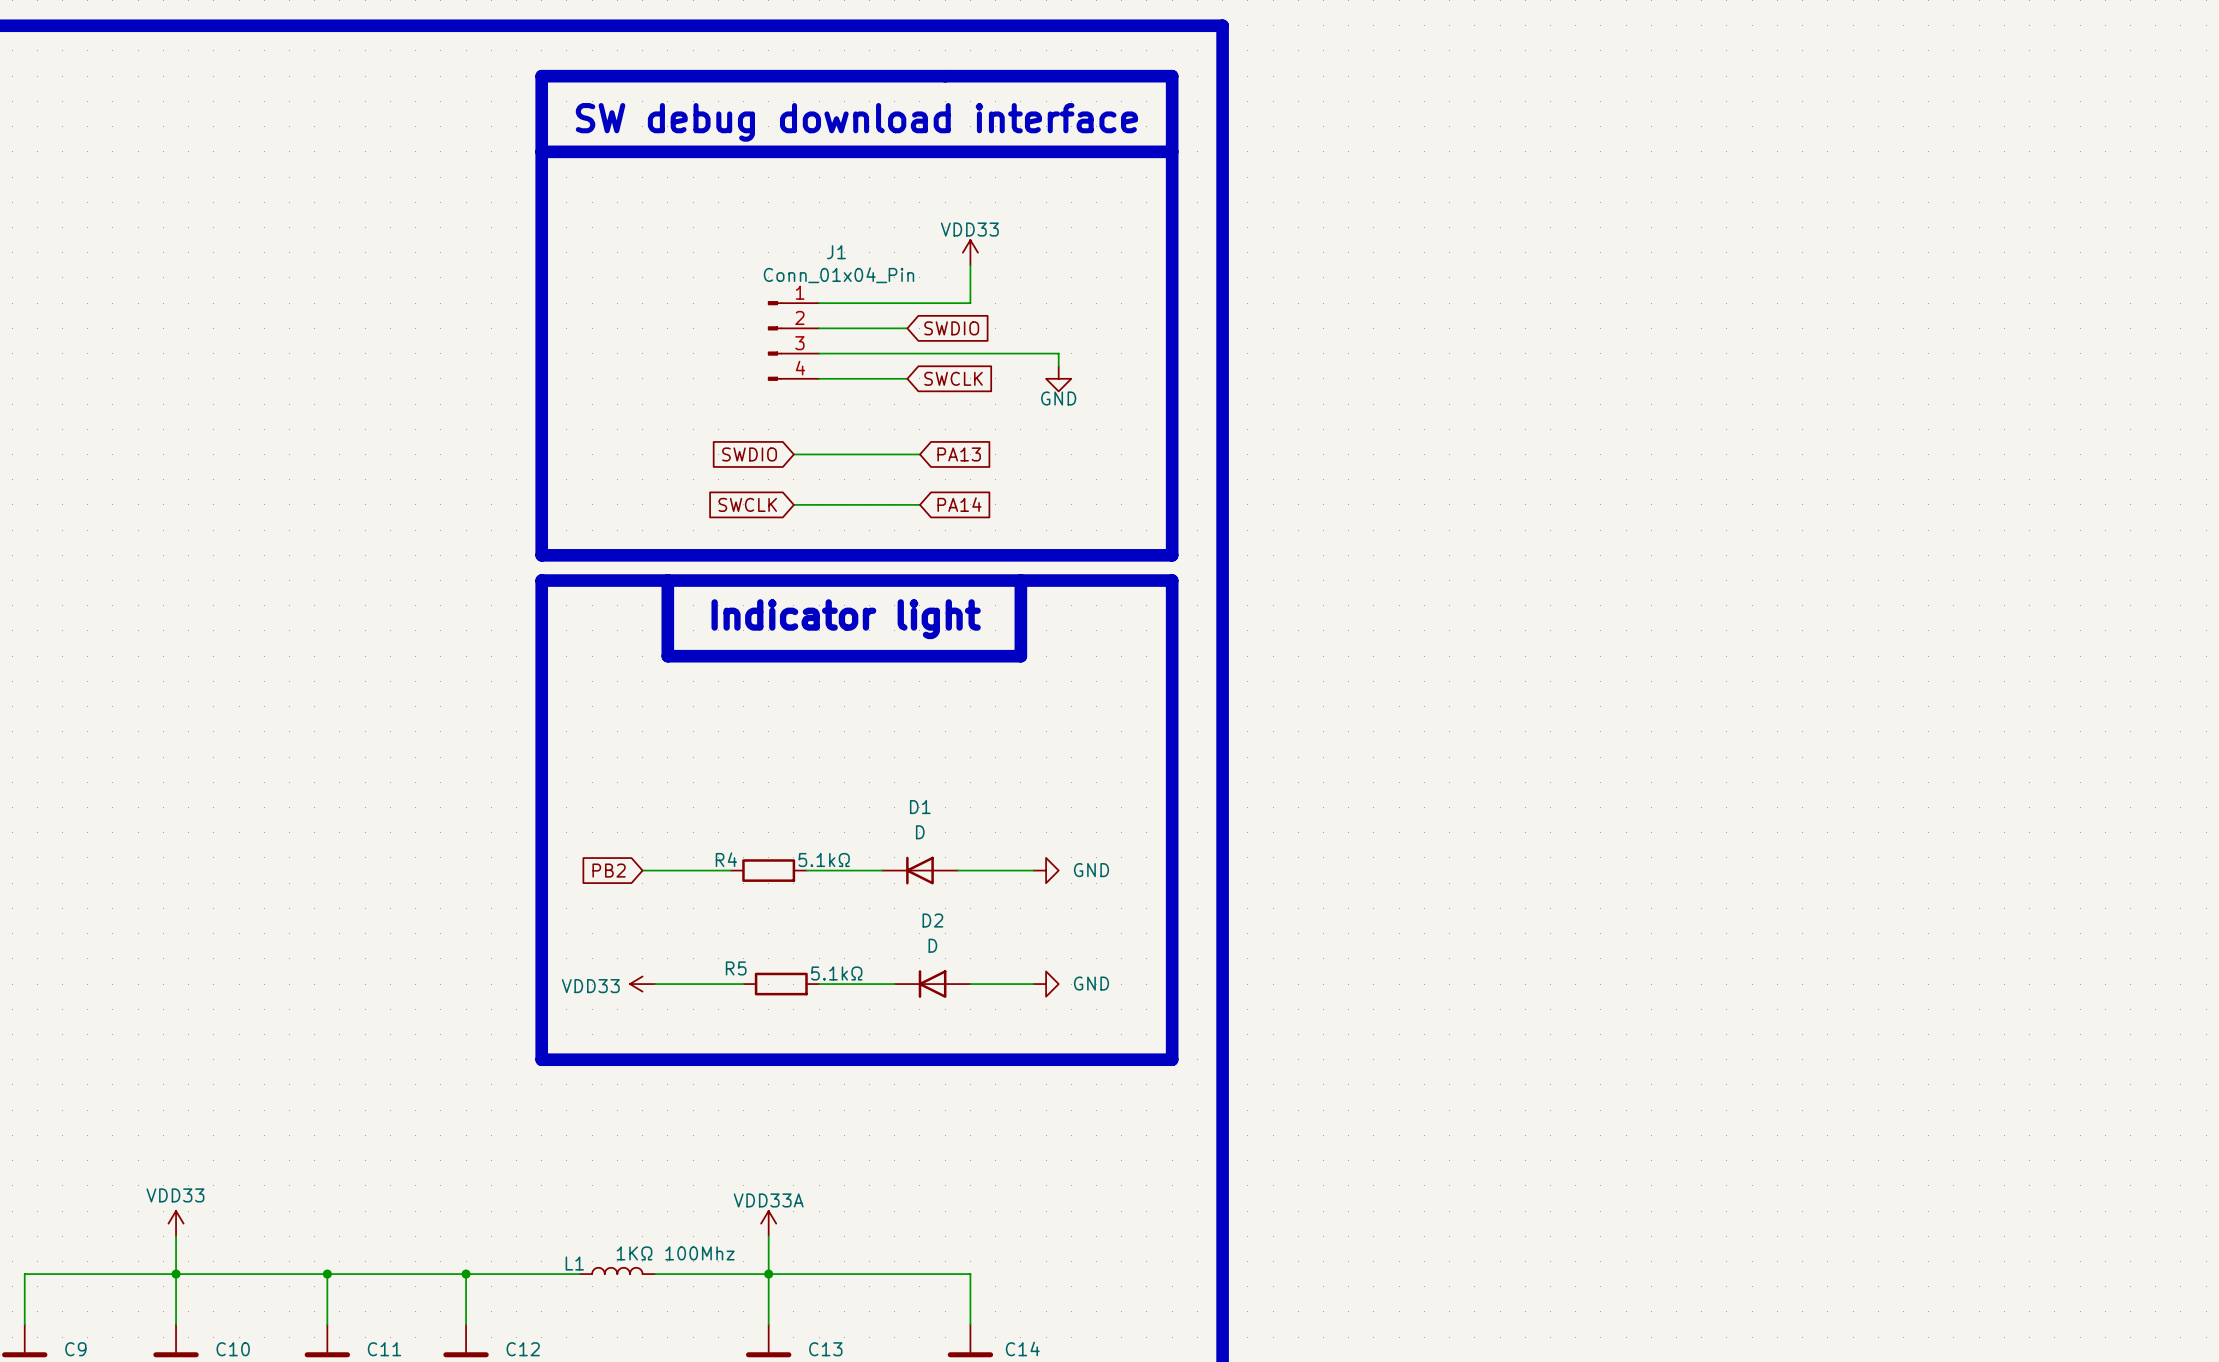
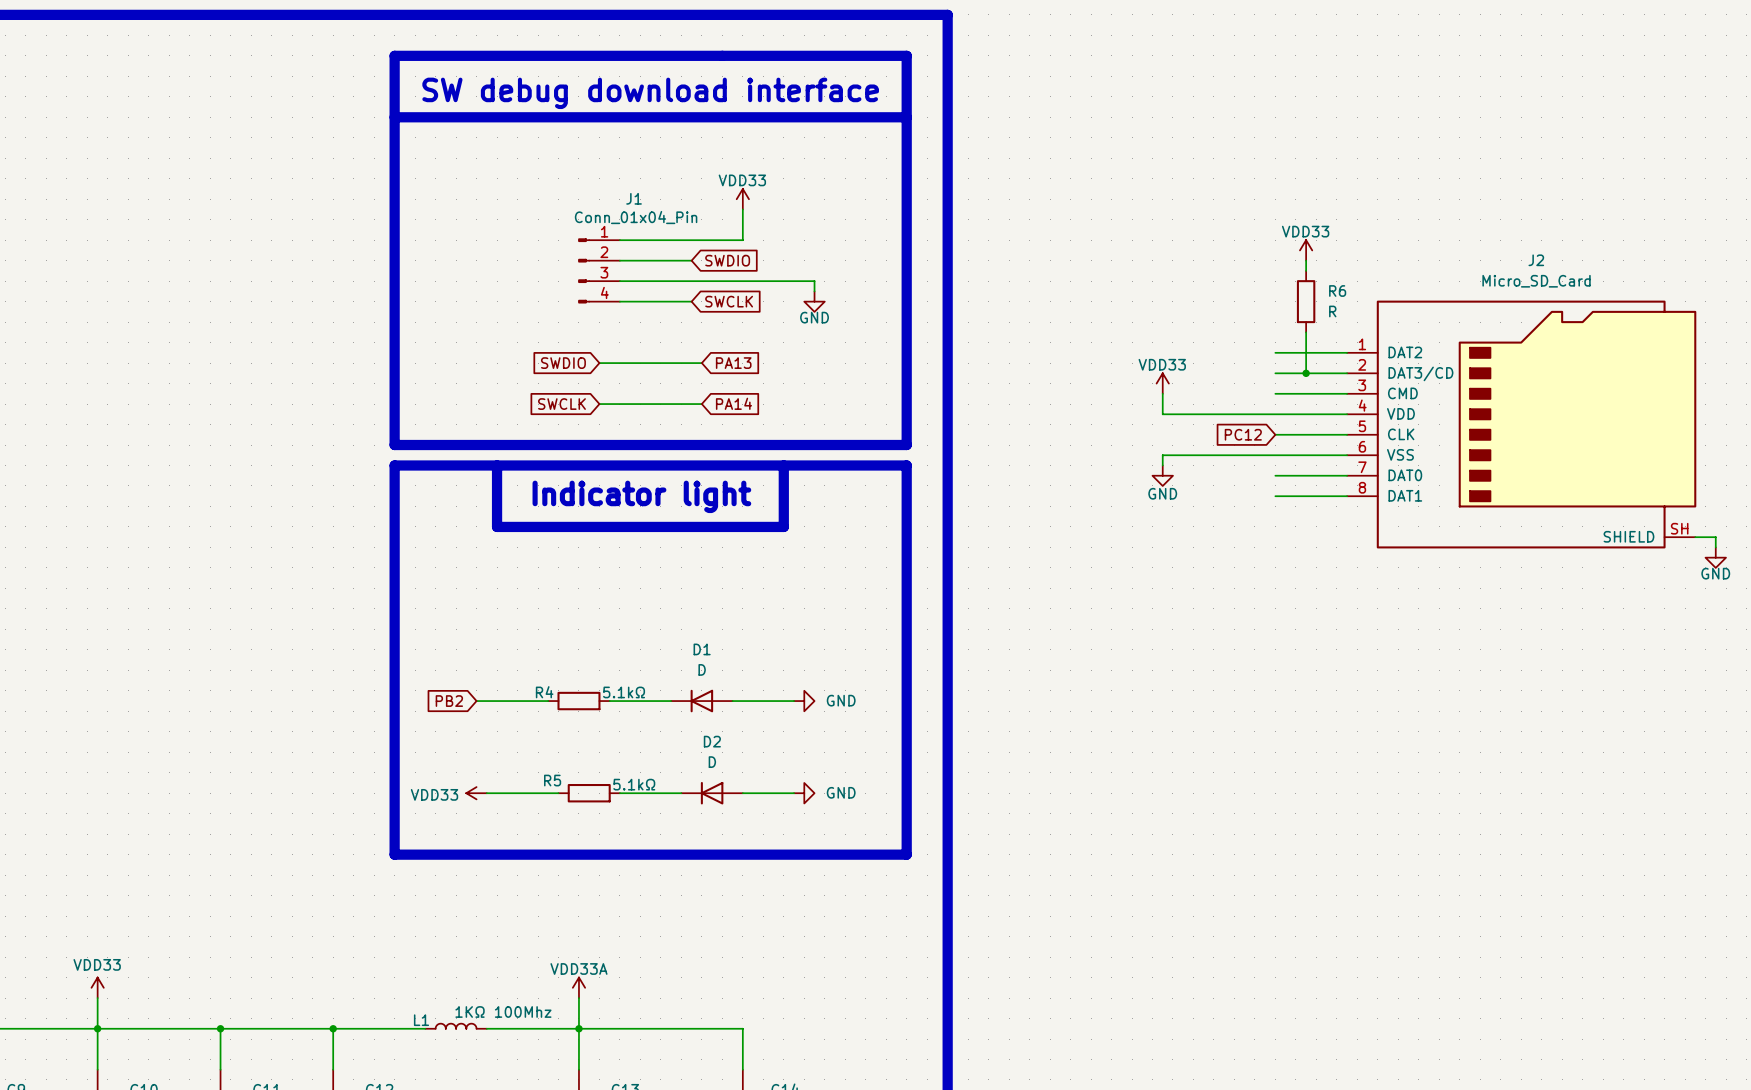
power symbol: none -> VDD33 (1306, 250)
wire: none -> (1306, 260) (1306, 270)
R6: none -> R (1306, 301)
wire: none -> (1306, 332) (1306, 373)
wire: none -> (1275, 352) (1347, 352)
wire: none -> (1275, 373) (1347, 373)
junction: none -> (1306, 373)
power symbol: none -> VDD33 (1162, 383)
wire: none -> (1162, 393) (1162, 414) (1347, 414)
wire: none -> (1275, 393) (1347, 393)
J2: none -> Micro_SD_Card (1521, 424)
global label: none -> PC12 (1243, 434)
wire: none -> (1275, 434) (1347, 434)
wire: none -> (1347, 455) (1162, 455) (1162, 465)
power symbol: none -> GND (1162, 475)
wire: none -> (1275, 475) (1347, 475)
wire: none -> (1275, 496) (1347, 496)
wire: none -> (1695, 537) (1715, 537) (1715, 547)
power symbol: none -> GND (1715, 557)

